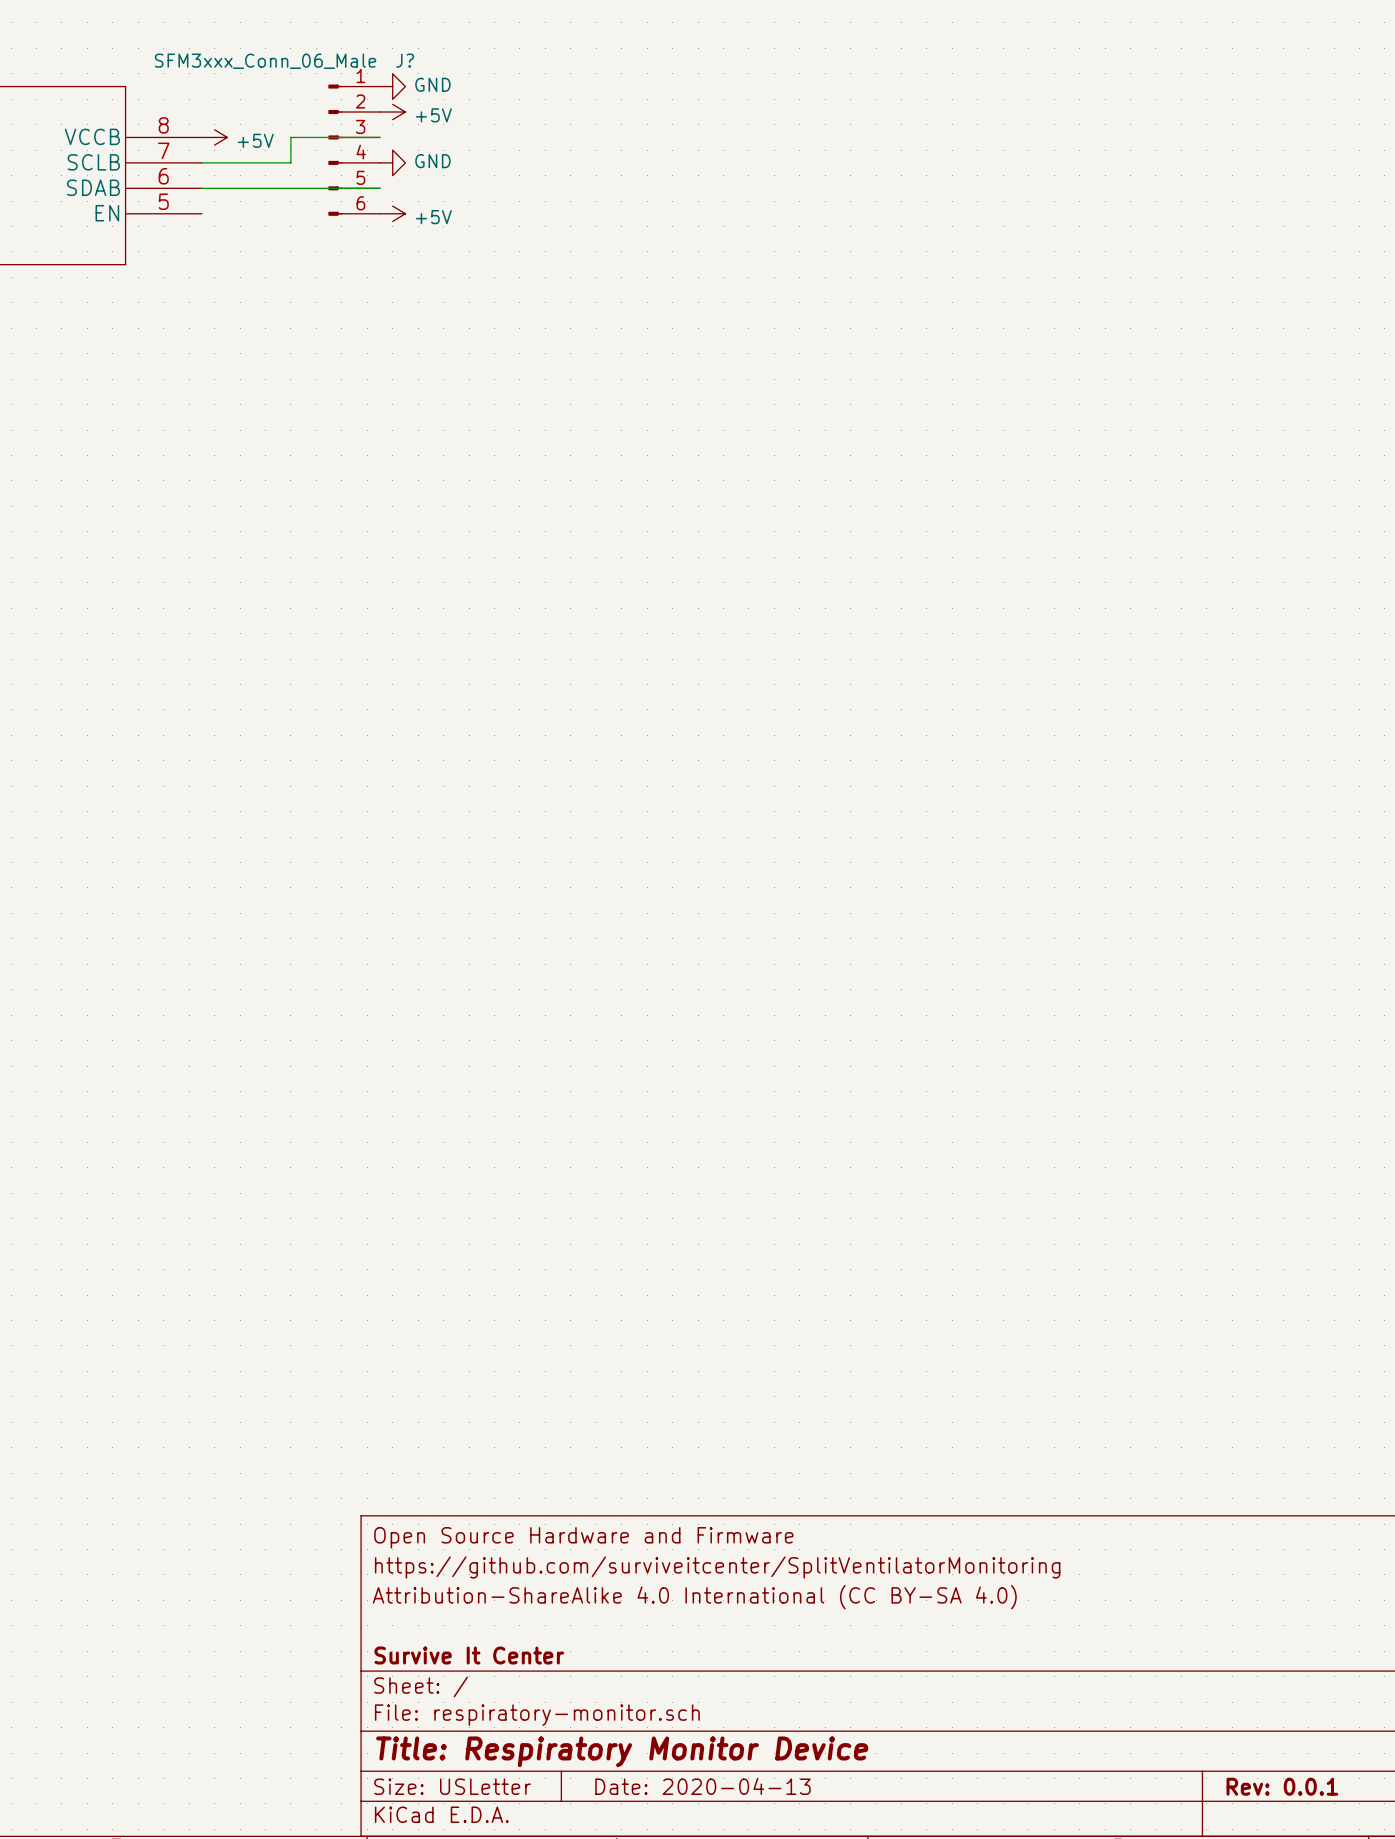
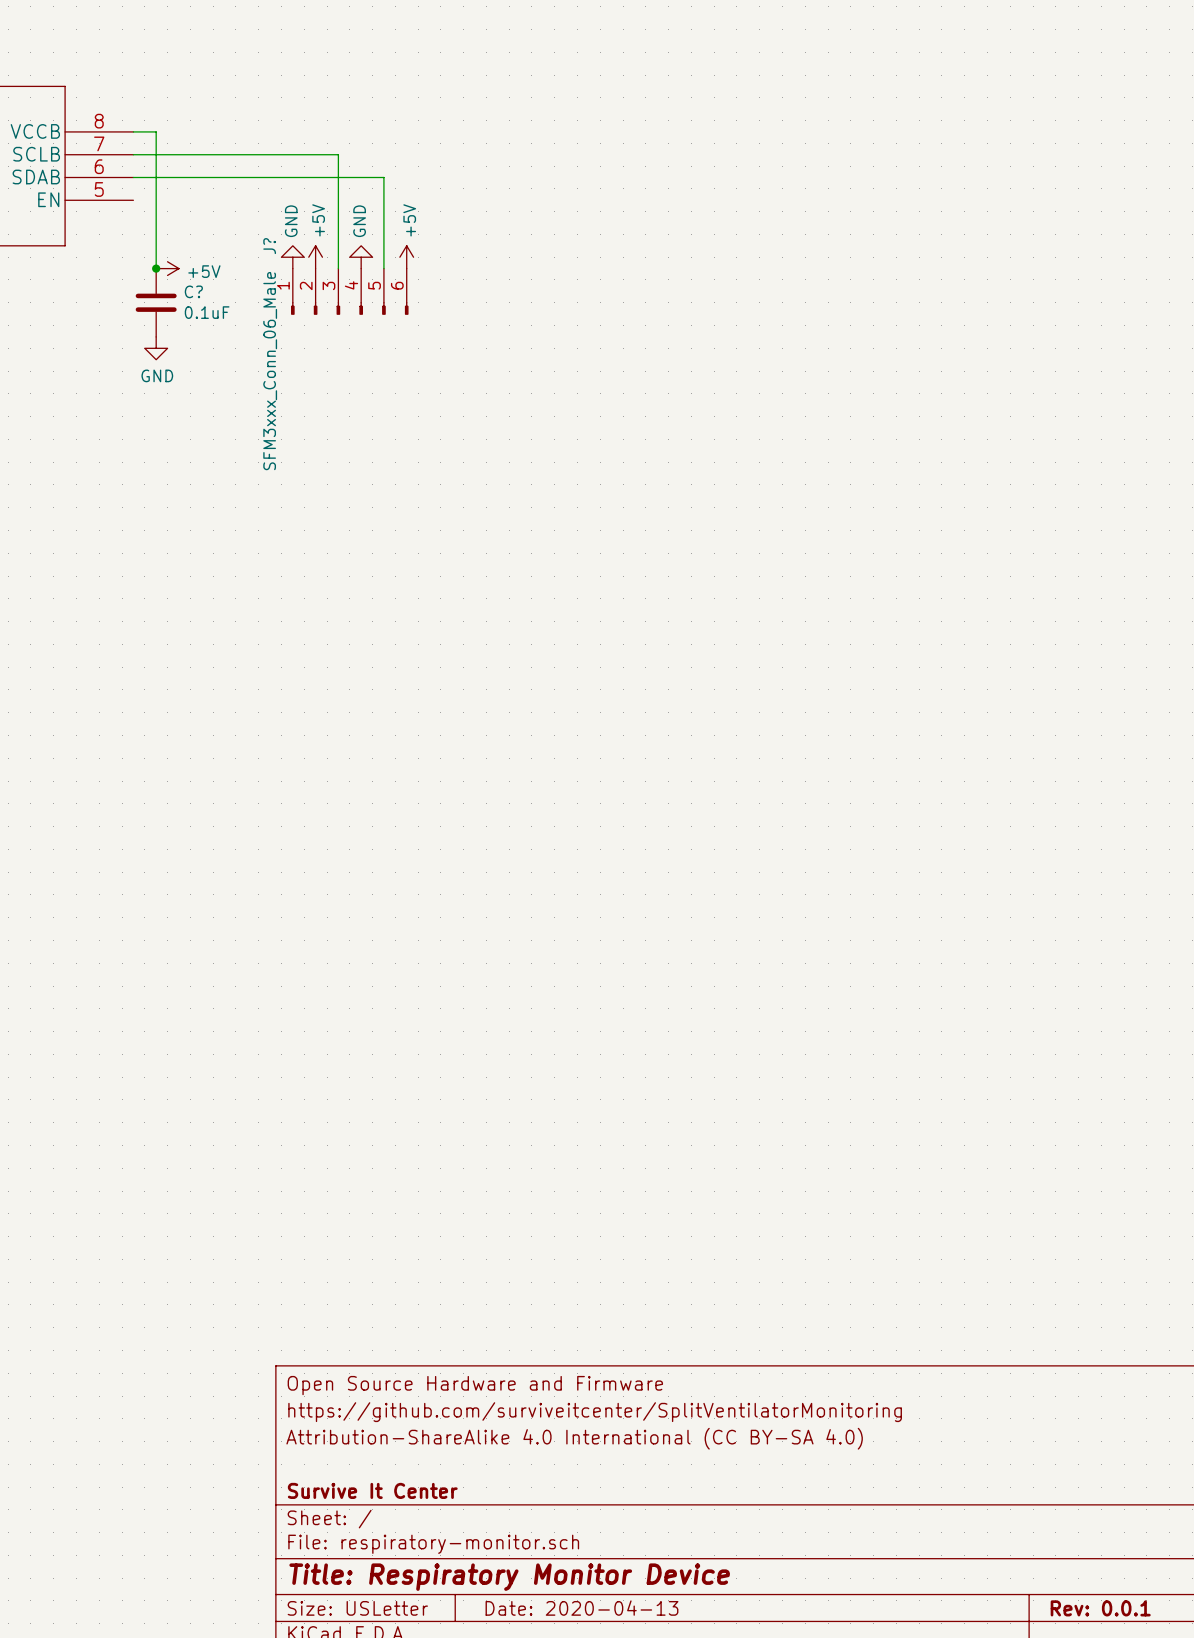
power symbol: GND (392, 86) -> none
power symbol: +5V (392, 112) -> none
wire: none -> (133, 131) (156, 131) (156, 268)
power symbol: +5V (214, 137) -> none
wire: (379, 137) (290, 137) (290, 162) -> (338, 268) (338, 154) (213, 154)
J? rotation: 0° (335, 150) -> 90° counterclockwise (349, 308)
J? position: (354, 150) -> (349, 291)
power symbol: GND (392, 162) -> none
wire: none -> (292, 177) (383, 177) (383, 268)
power symbol rotation: 0° (392, 213) -> 90° counterclockwise (315, 257)
power symbol position: +5V (392, 213) -> +5V (315, 257)
power symbol: none -> GND (292, 257)
power symbol: none -> GND (361, 257)
power symbol: none -> +5V (406, 257)
junction: none -> (156, 268)
power symbol: none -> +5V (167, 268)
C?: none -> 0.1uF (156, 302)
power symbol: none -> GND (156, 348)

